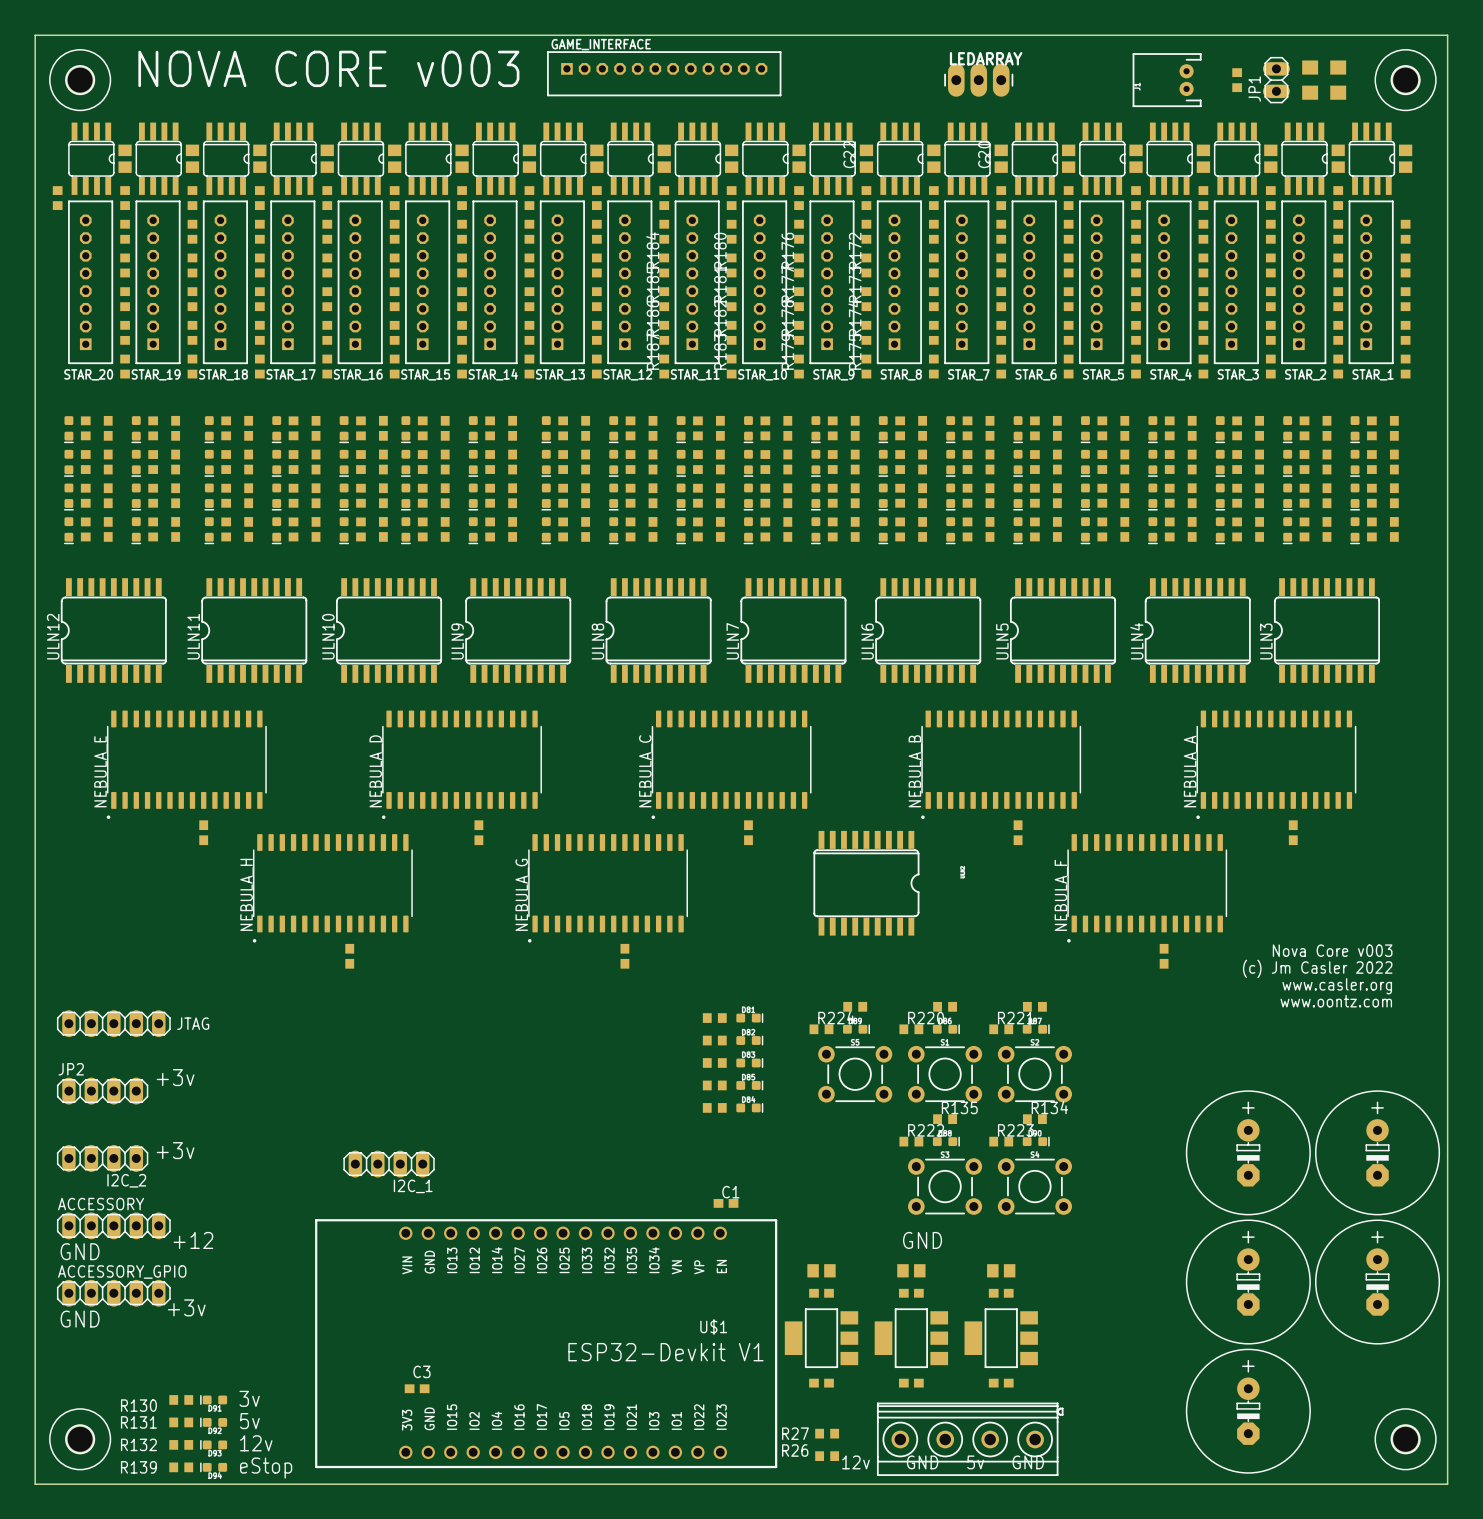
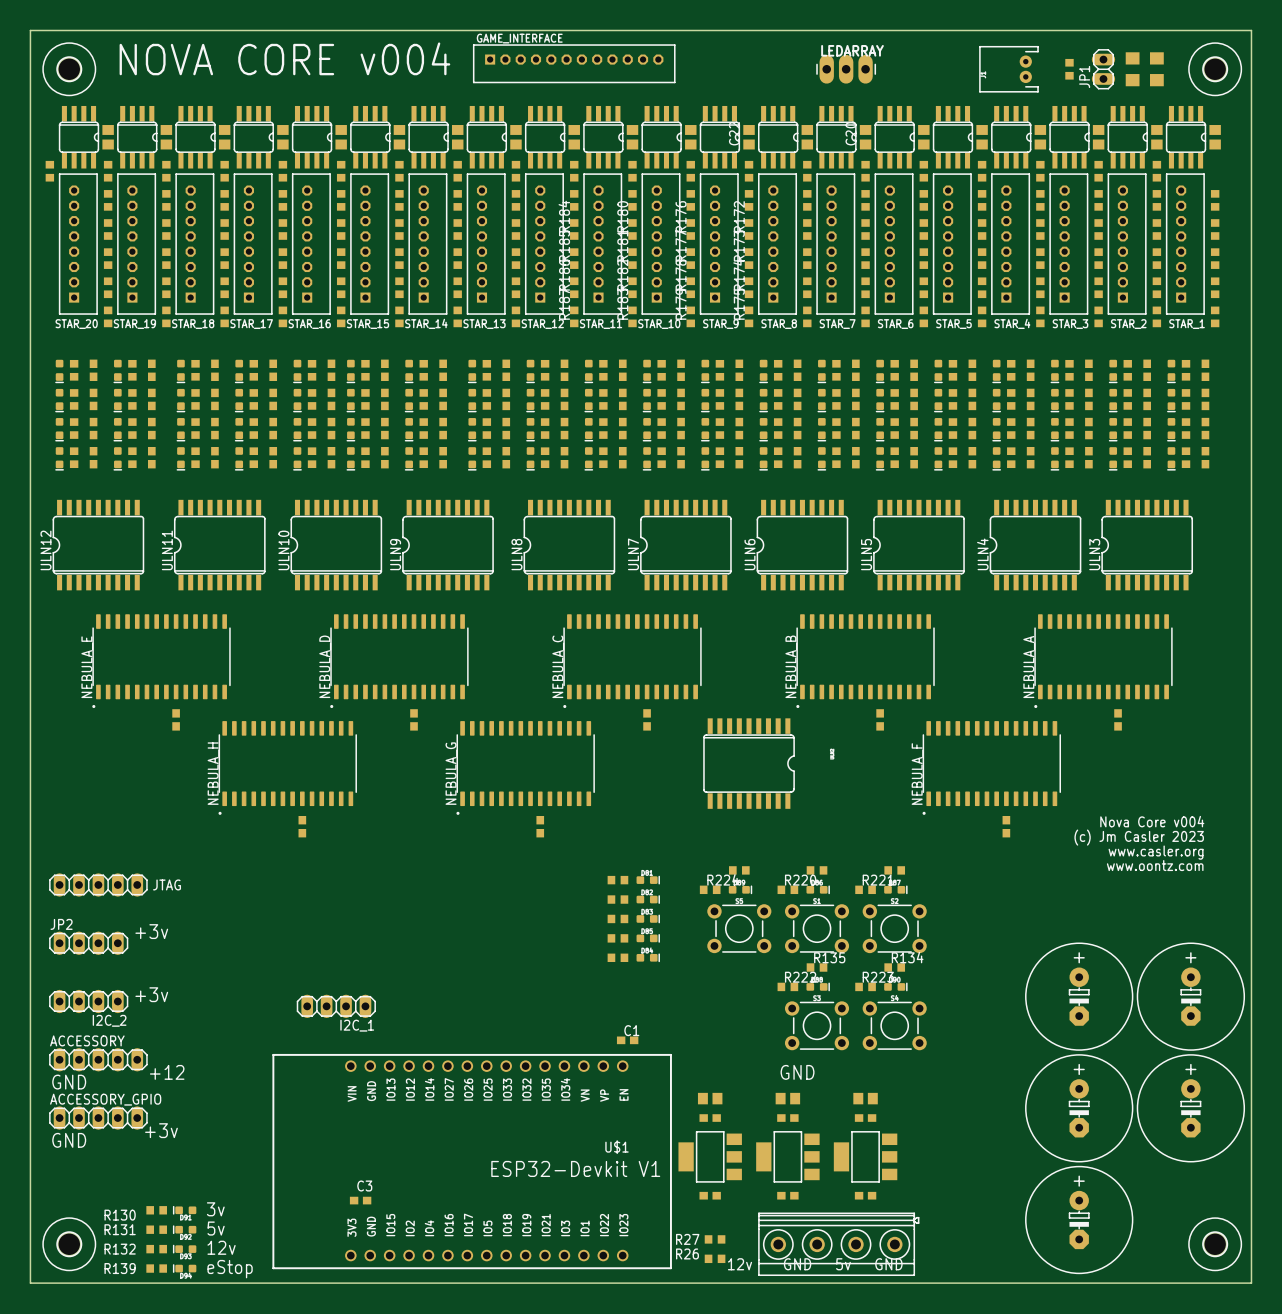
text: NOVA CORE v003 (328, 68) -> NOVA CORE v004 (284, 58)
text: Nova Core v003 (1332, 950) -> Nova Core v004 (1152, 821)
text: (c) Jm Casler 2022 (1317, 968) -> (c) Jm Casler 2023 (1139, 837)

